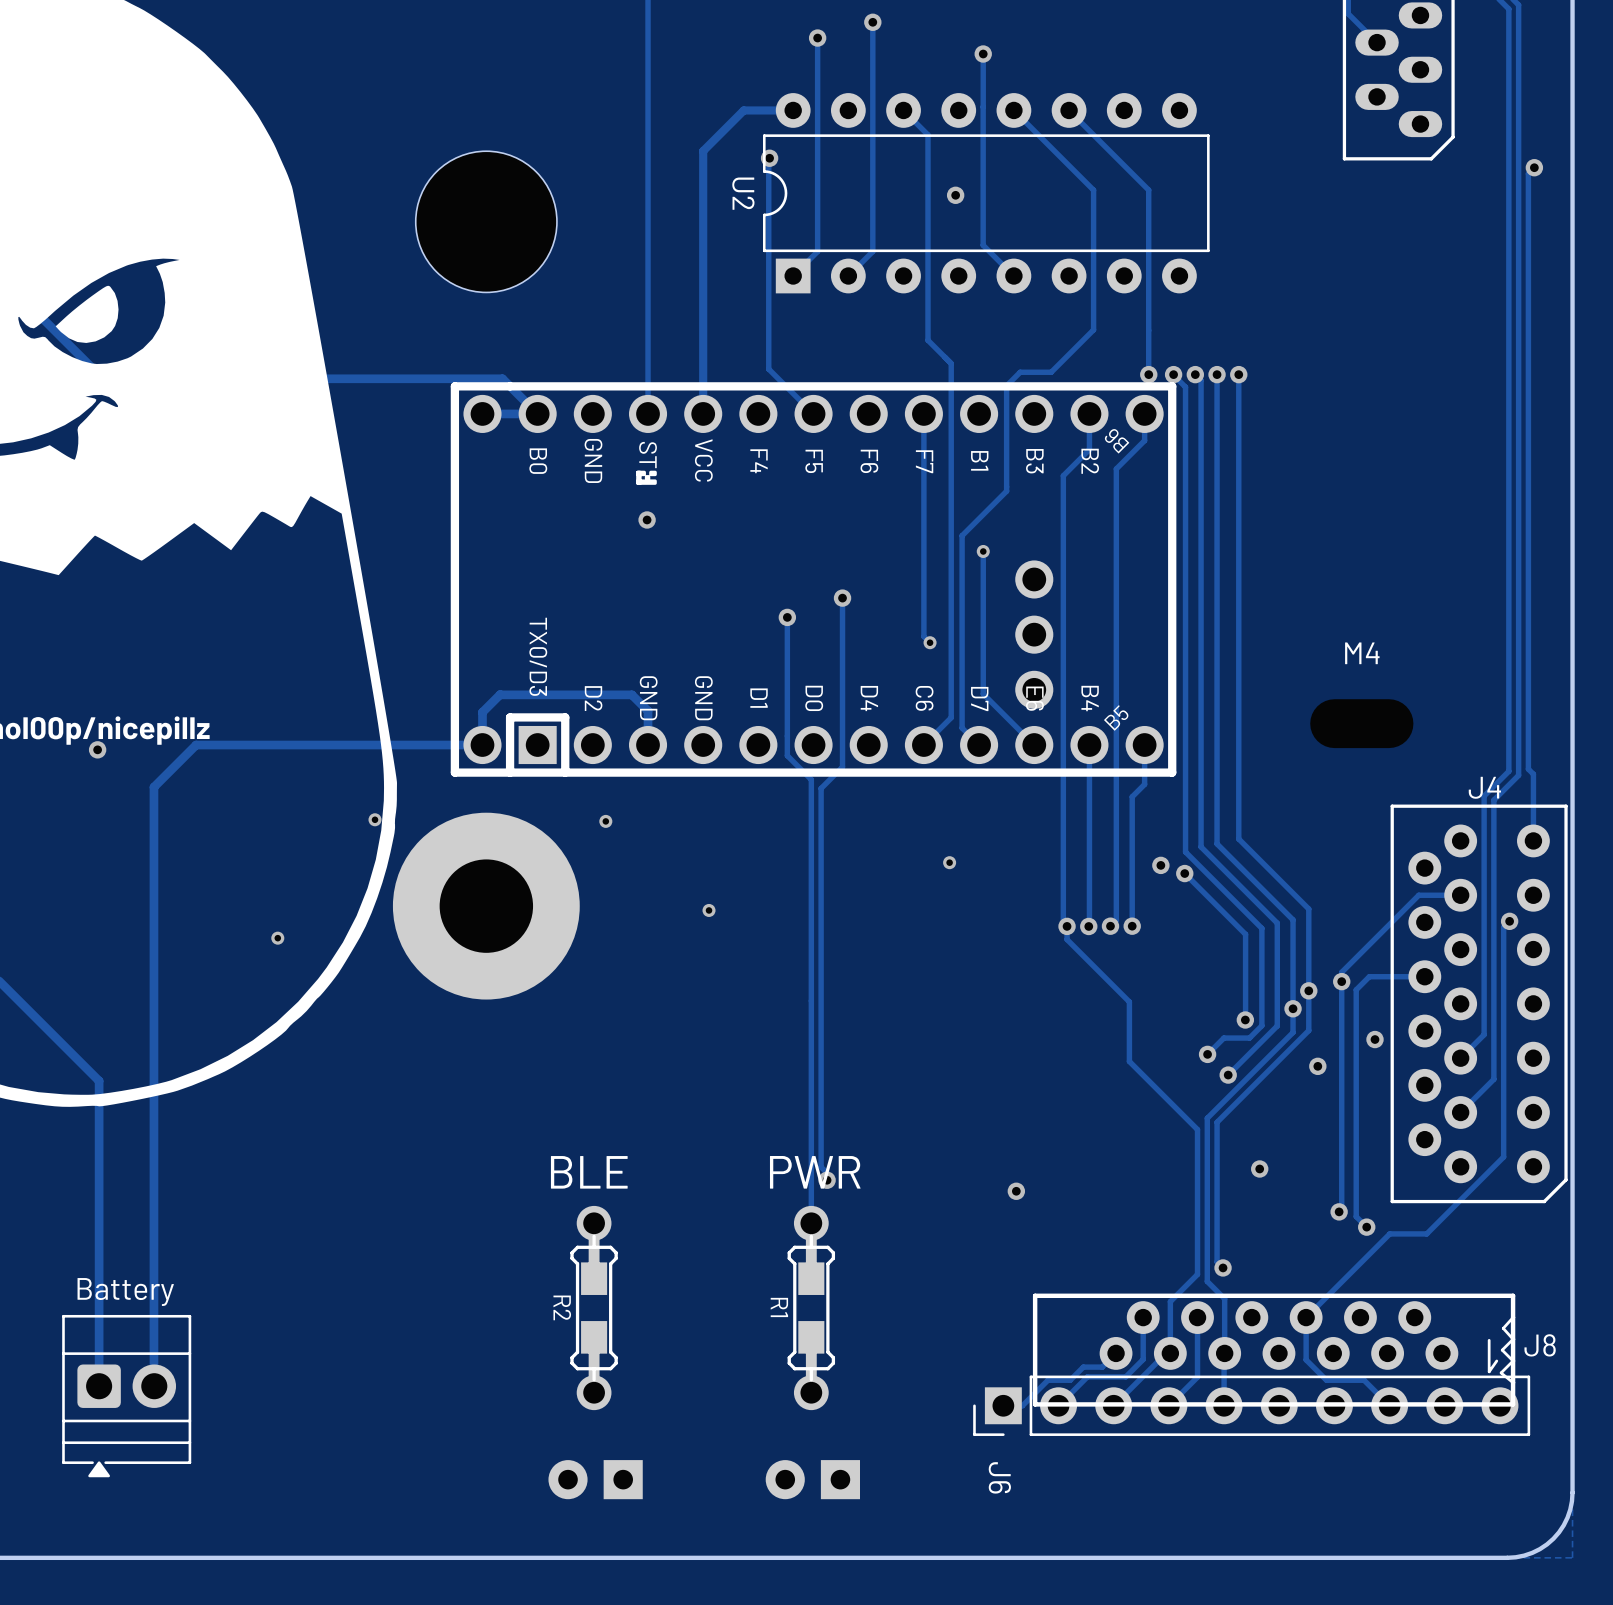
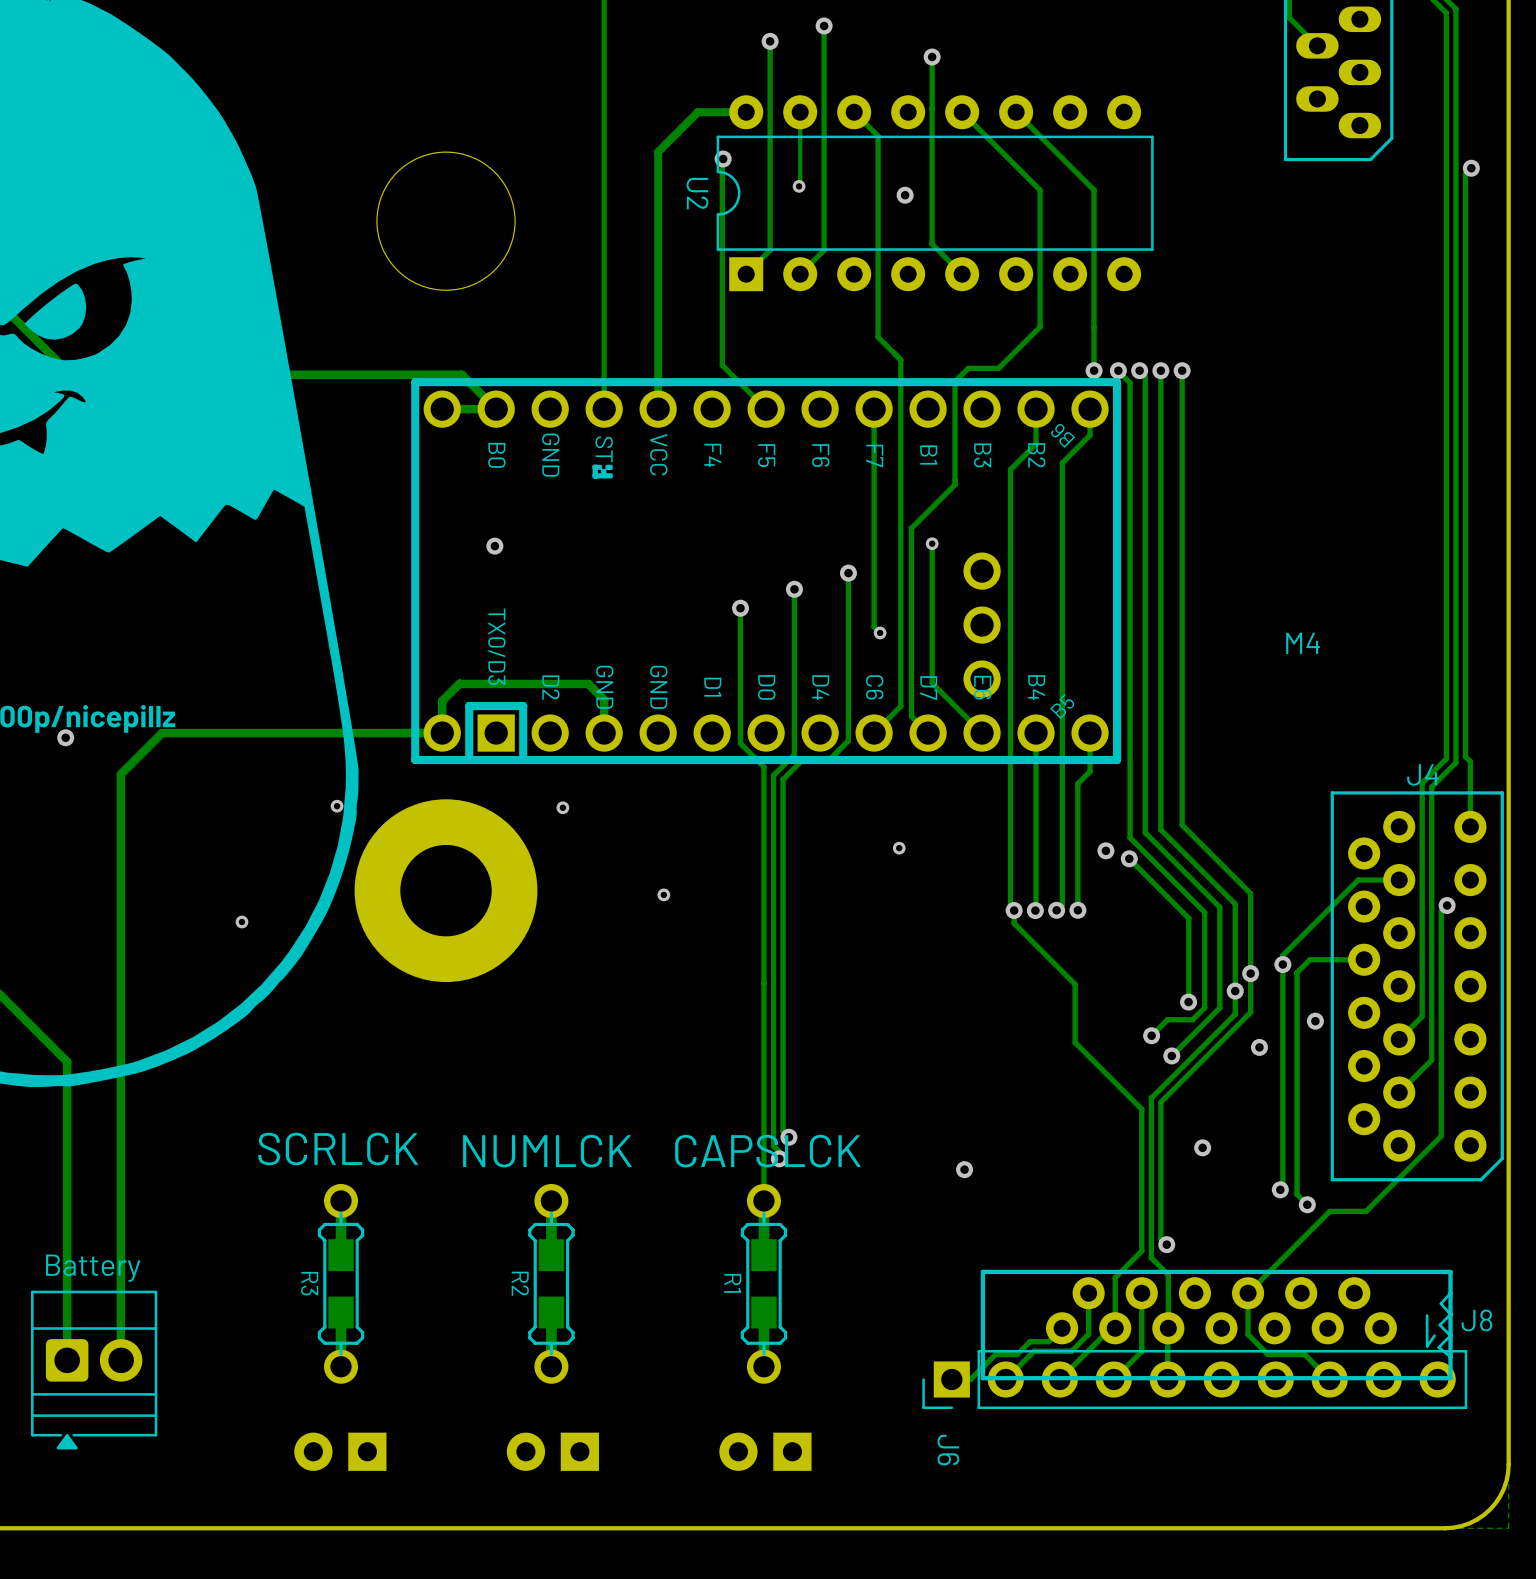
track: none -> (800, 112) (800, 185) (798, 187)
via: none -> (799, 186)
via position: (647, 519) -> (494, 546)
track: none -> (848, 573) (848, 740) (830, 758) (804, 758) (783, 779) (783, 1131) (788, 1137)
via: none -> (848, 573)
via: none -> (788, 1137)
text: none -> SCRLCK (338, 1149)
text: BLE (589, 1172) -> NUMLCK (547, 1151)
text: PWR (815, 1172) -> CAPSLCK (767, 1151)
R3: none -> (341, 1283)
part: none -> (340, 1451)

